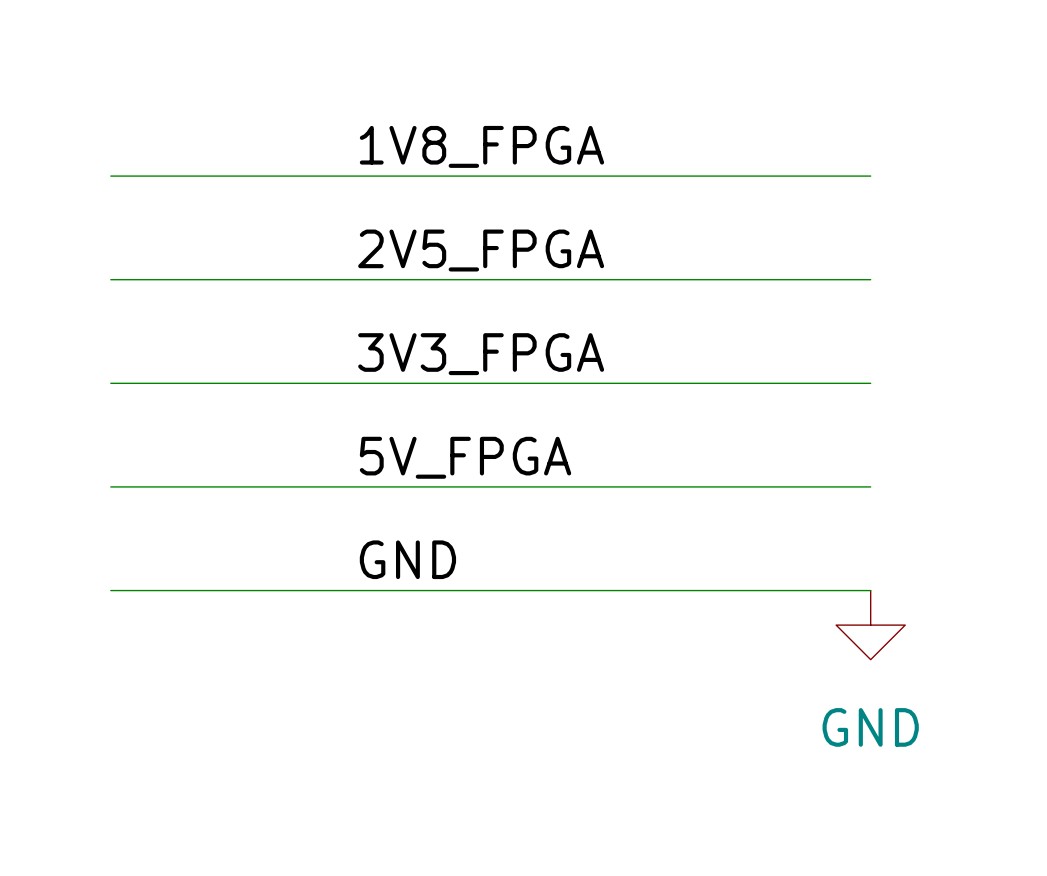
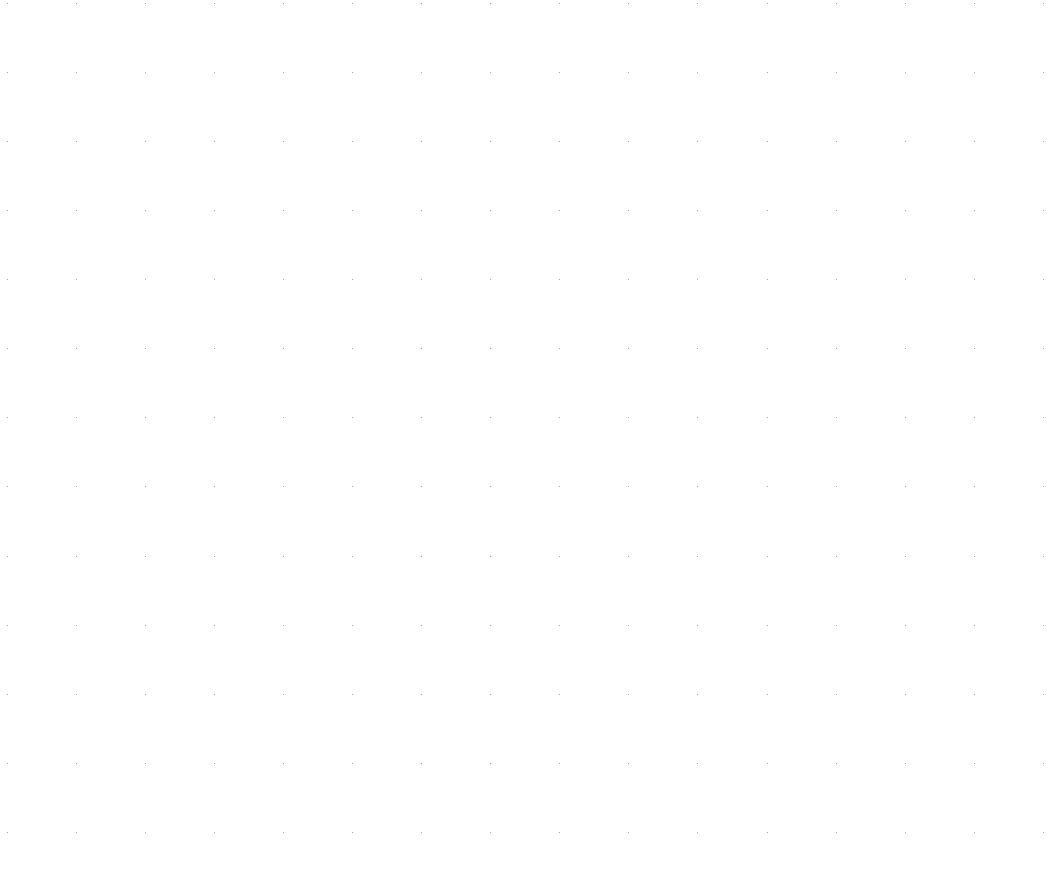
label: 1V8_FPGA (481, 146) -> none
wire: (110, 176) (870, 176) -> none
label: 2V5_FPGA (481, 250) -> none
wire: (110, 279) (870, 279) -> none
label: 3V3_FPGA (481, 354) -> none
wire: (110, 383) (870, 383) -> none
label: 5V_FPGA (465, 457) -> none
wire: (110, 486) (870, 486) -> none
label: GND (407, 559) -> none
wire: (110, 590) (870, 590) -> none
power symbol: GND (870, 625) -> none

